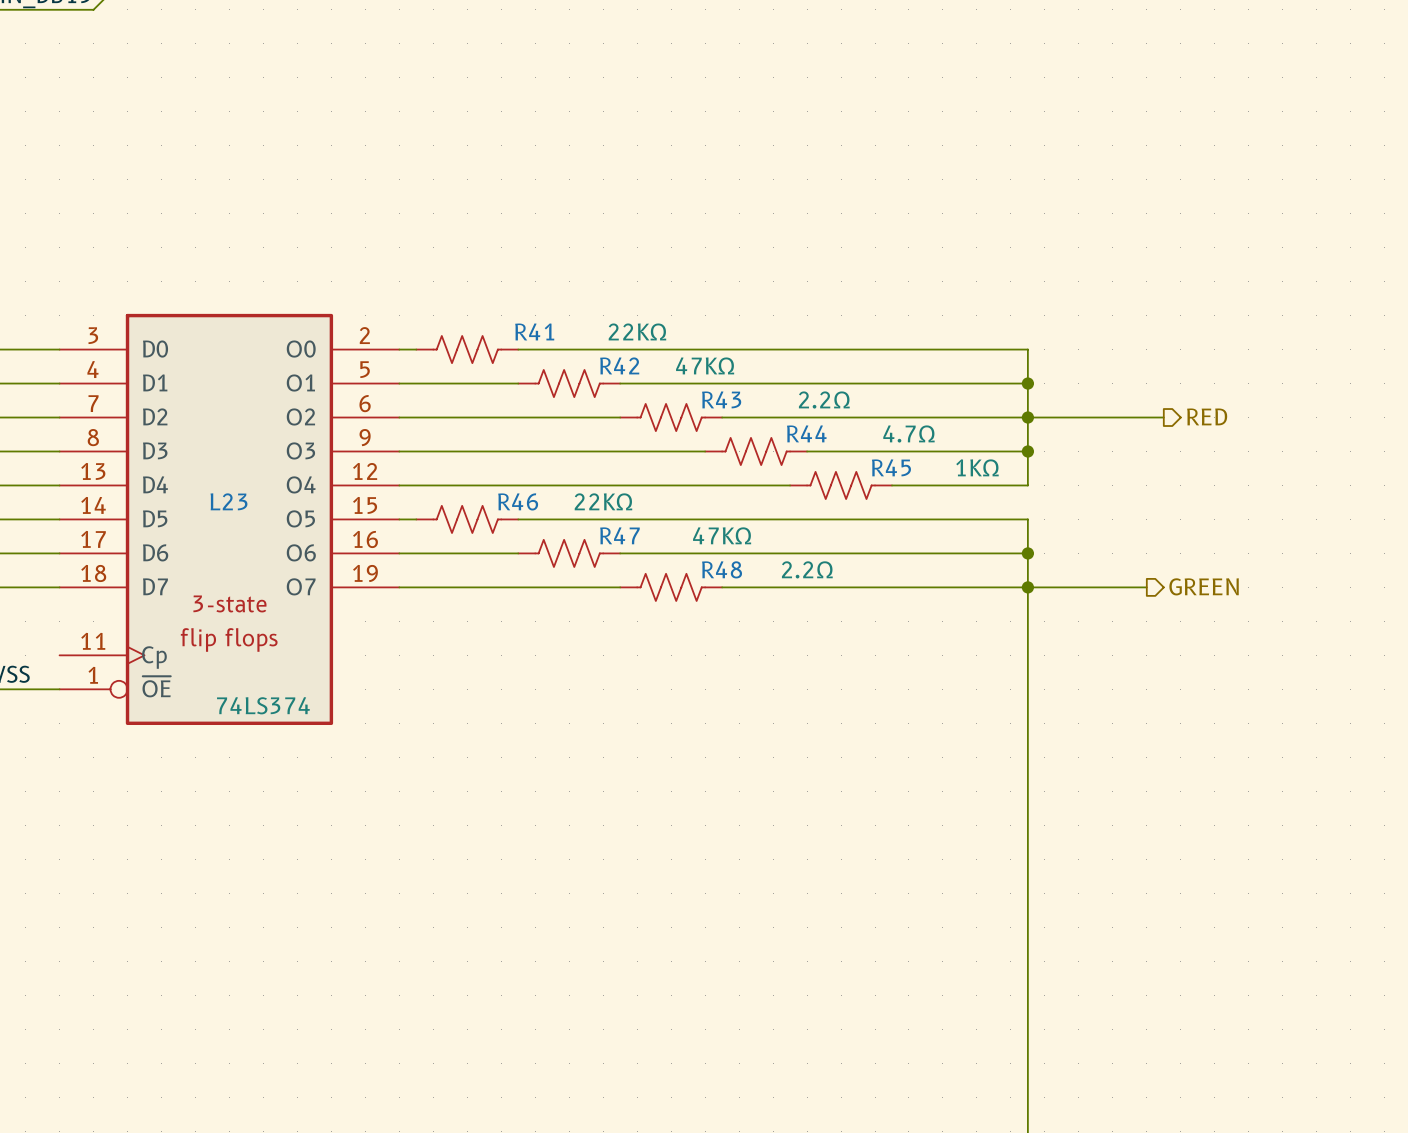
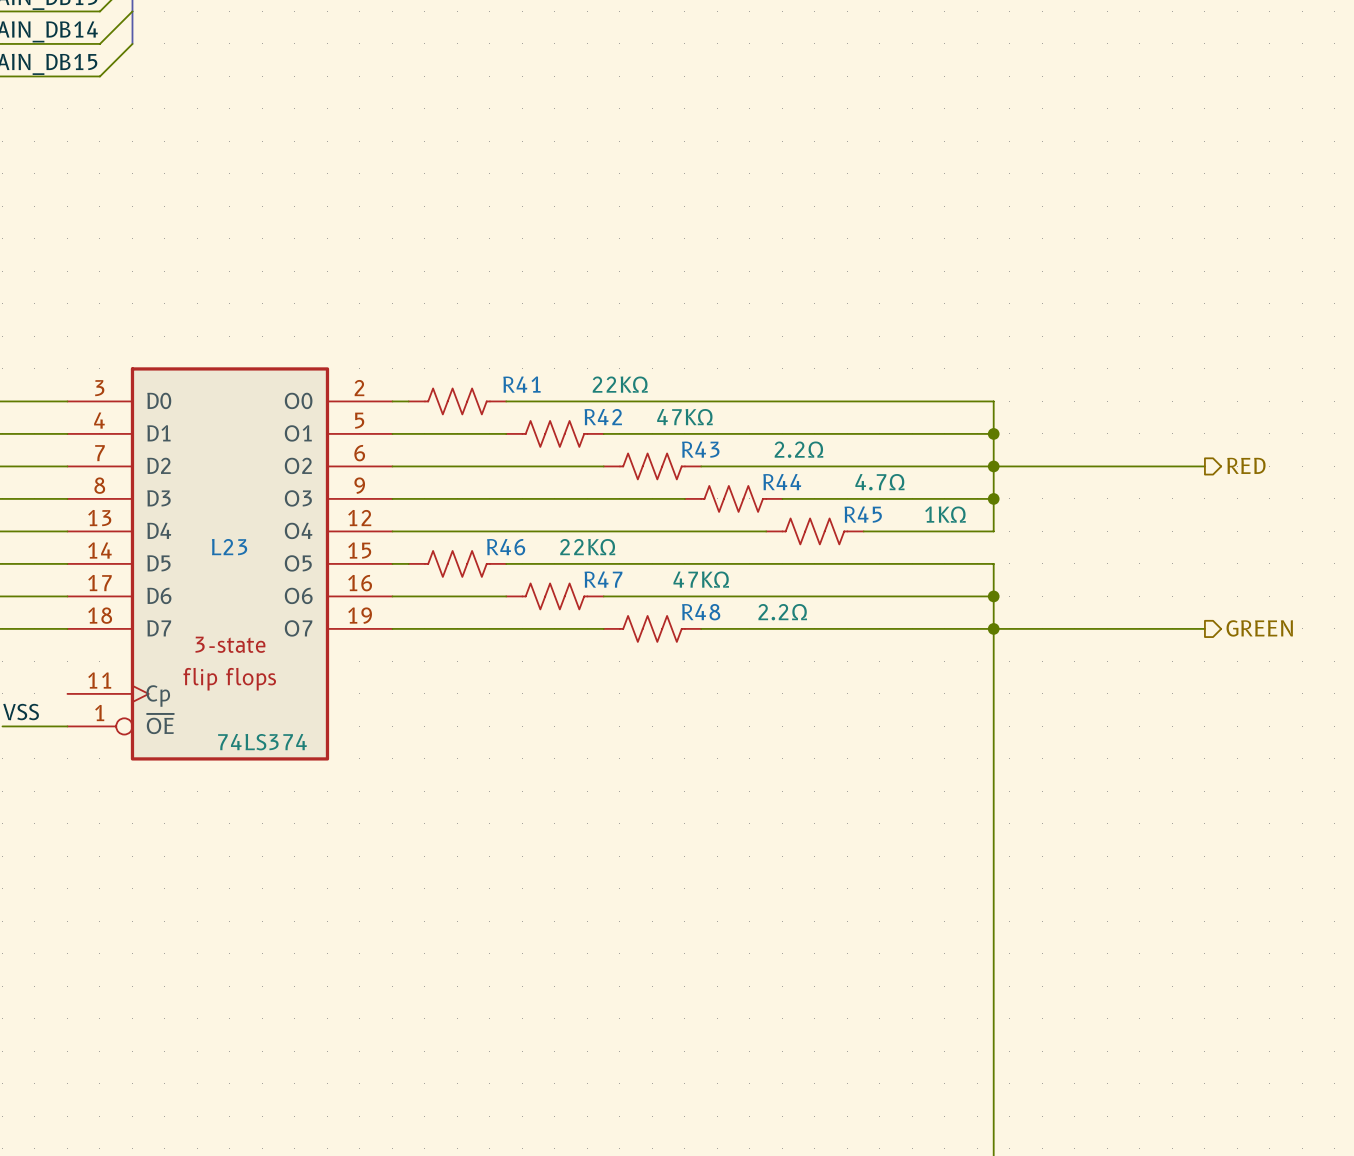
hierarchical label position: RED (1207, 416) -> RED (1246, 465)
wire: none -> (1123, 466) (1204, 466)
hierarchical label position: GREEN (1204, 586) -> GREEN (1259, 628)
wire: none -> (1107, 628) (1204, 628)

